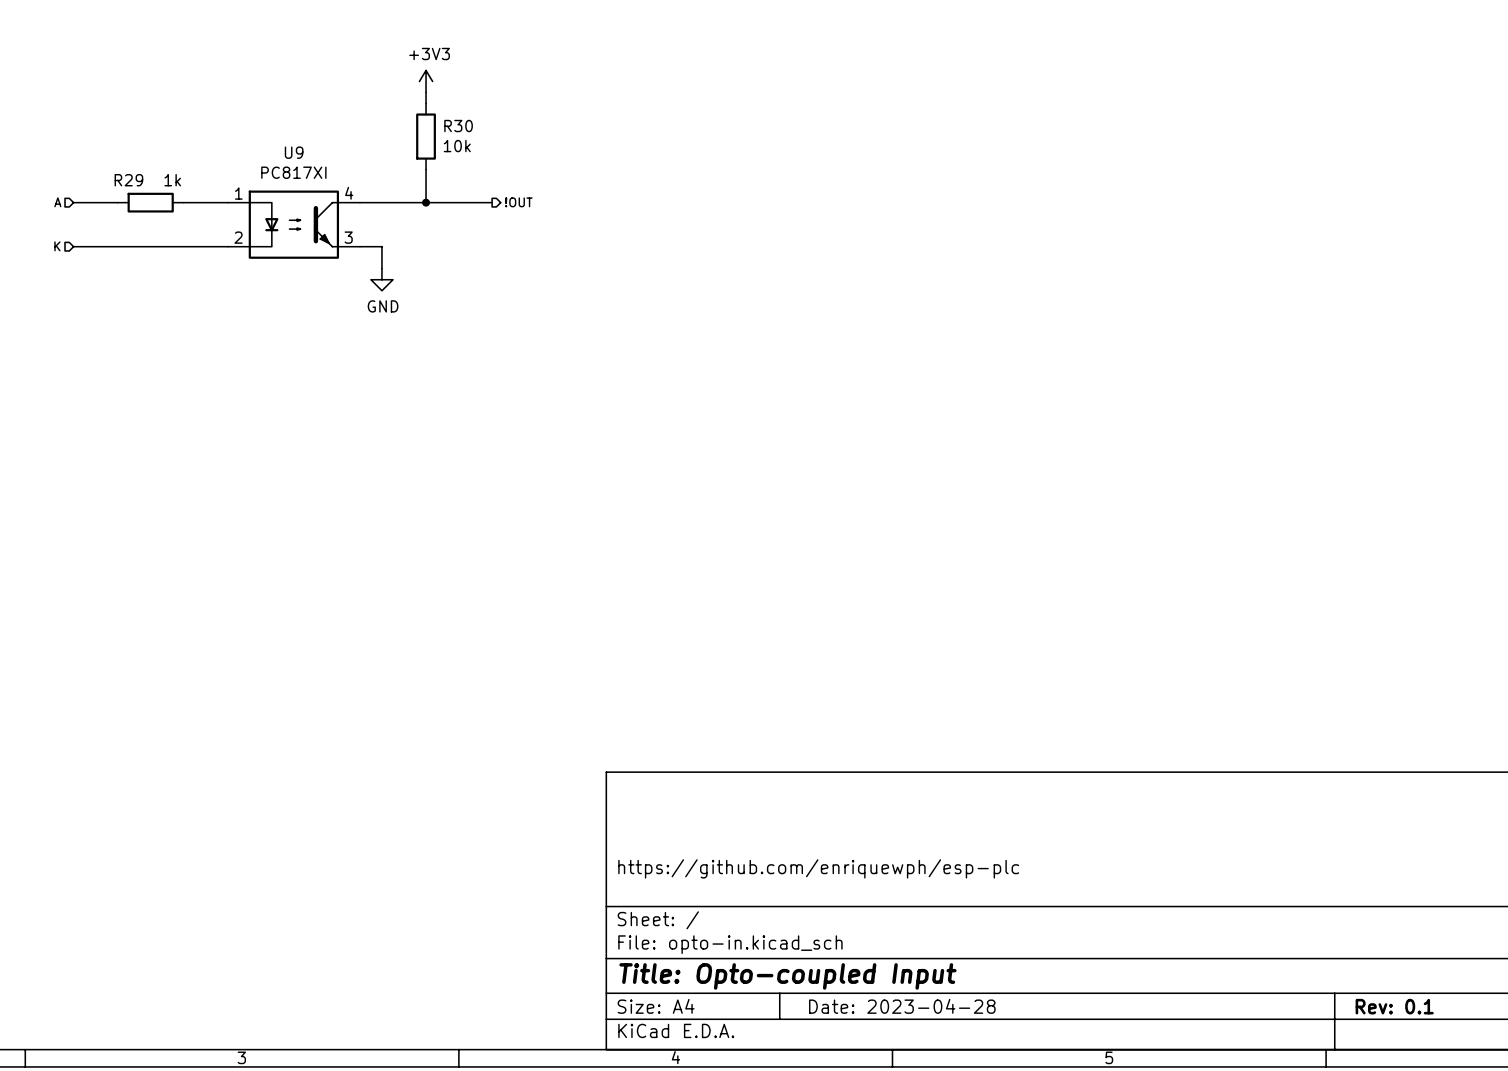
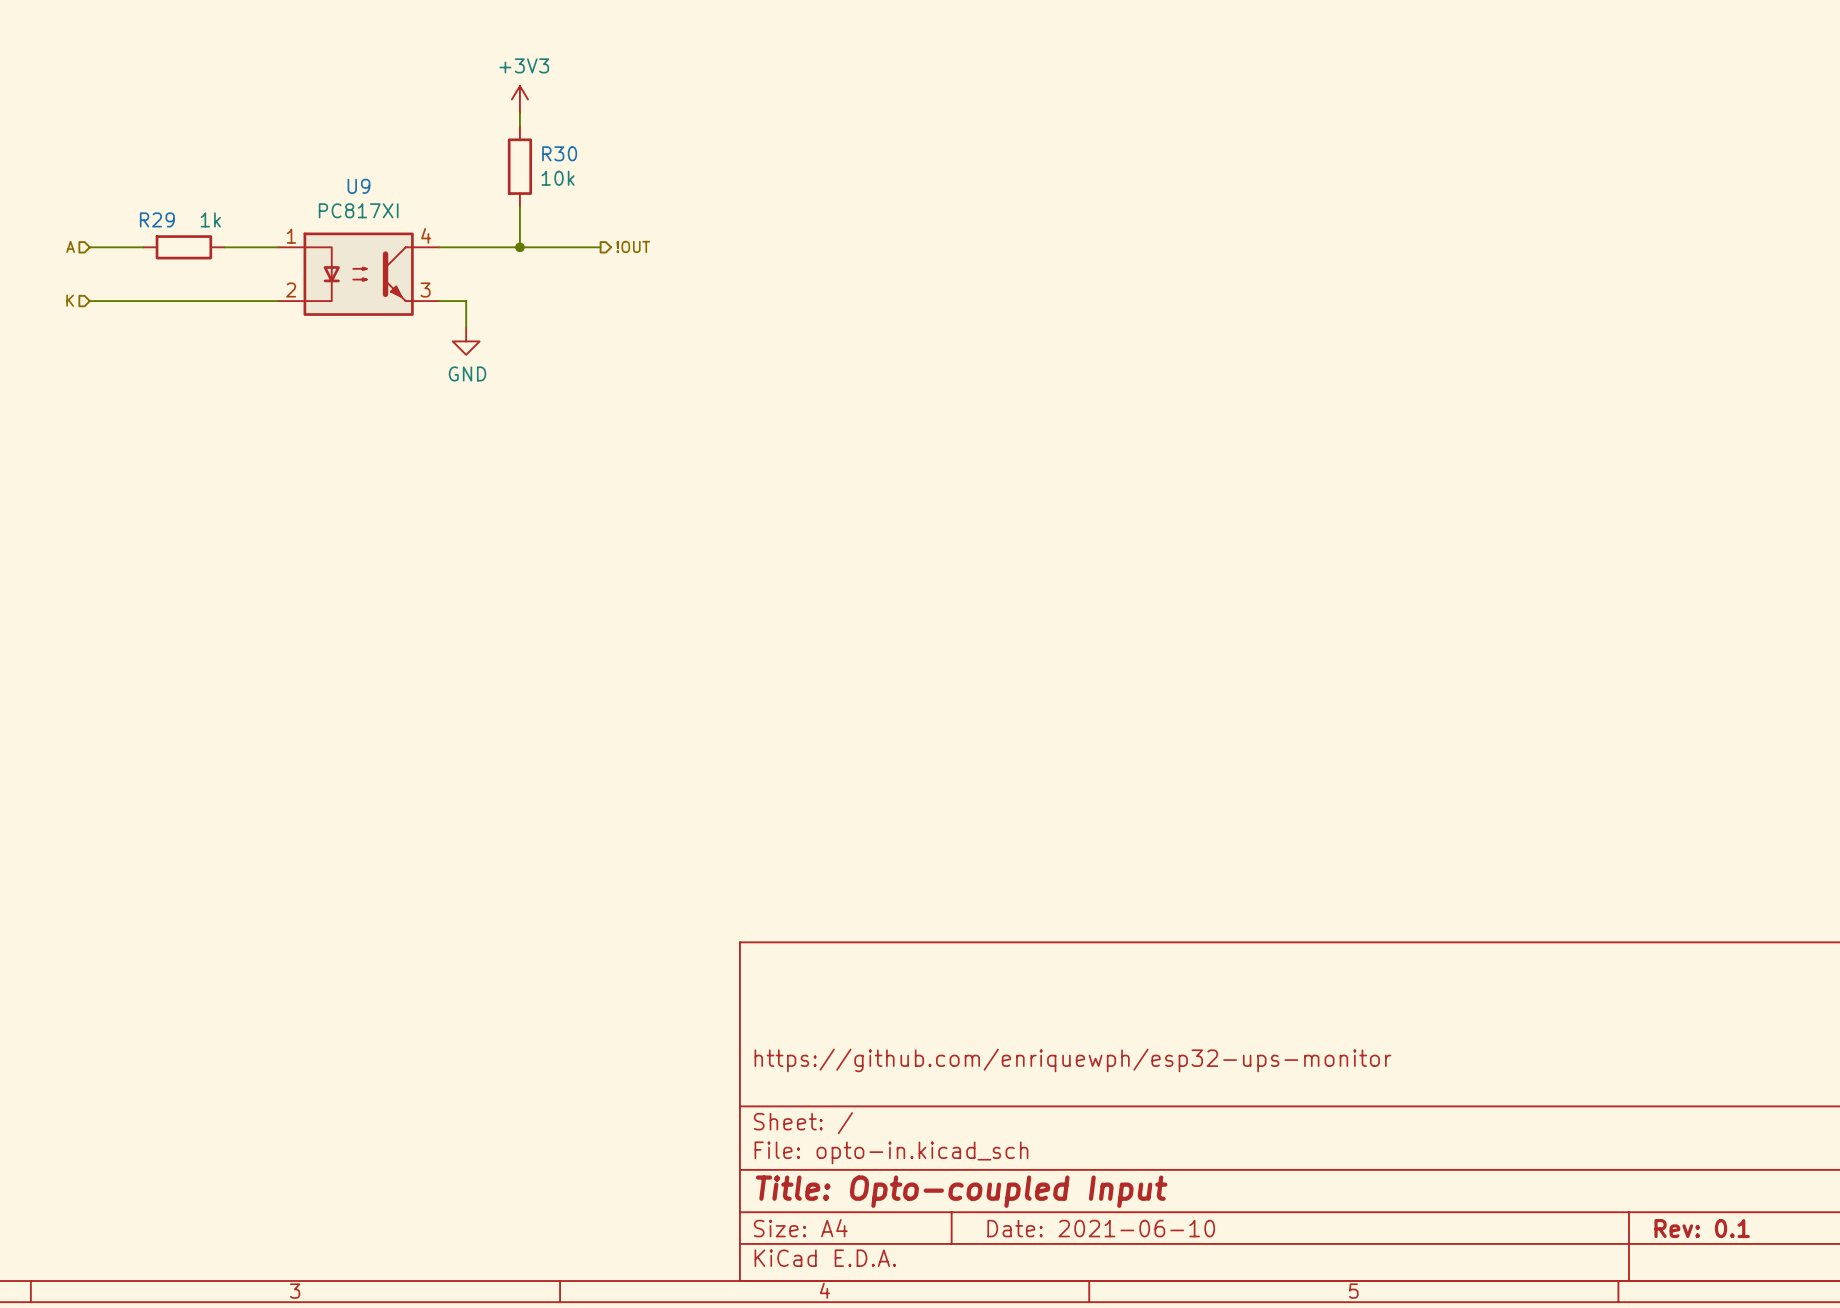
title block: https://github.com/enriquewph/esp-plc (818, 868) -> https://github.com/enriquewph/esp32-ups-monitor (1072, 1060)
title block: Date: 2023-04-28 (902, 1006) -> Date: 2021-06-10 (1101, 1228)

